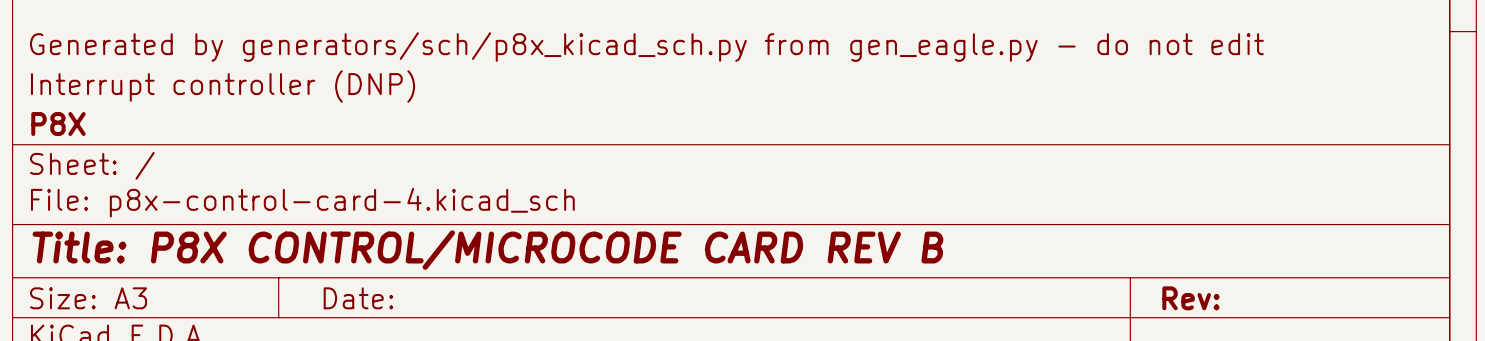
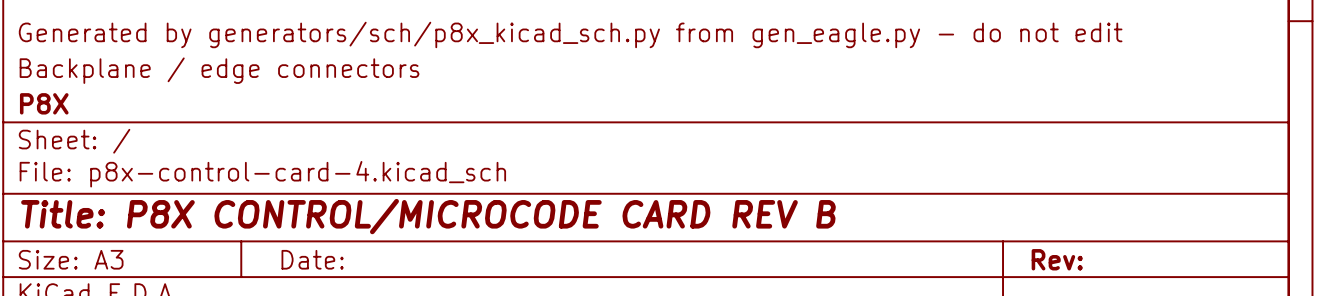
title block: Interrupt controller (DNP) (223, 86) -> Backplane / edge connectors (219, 70)

